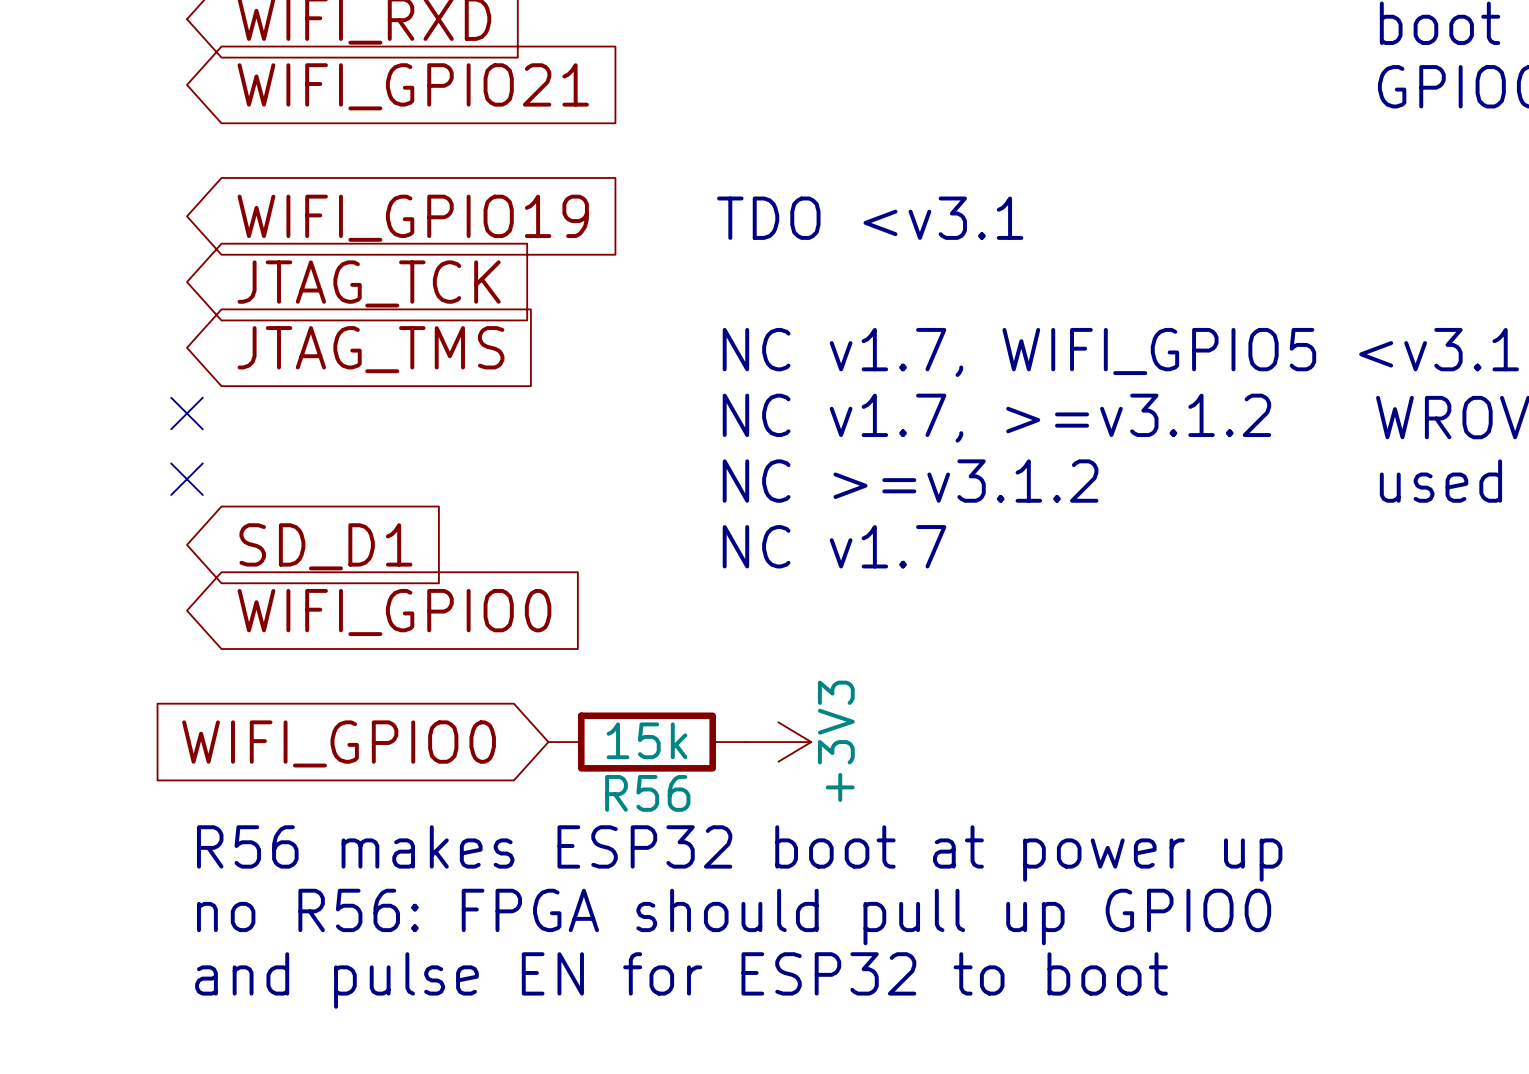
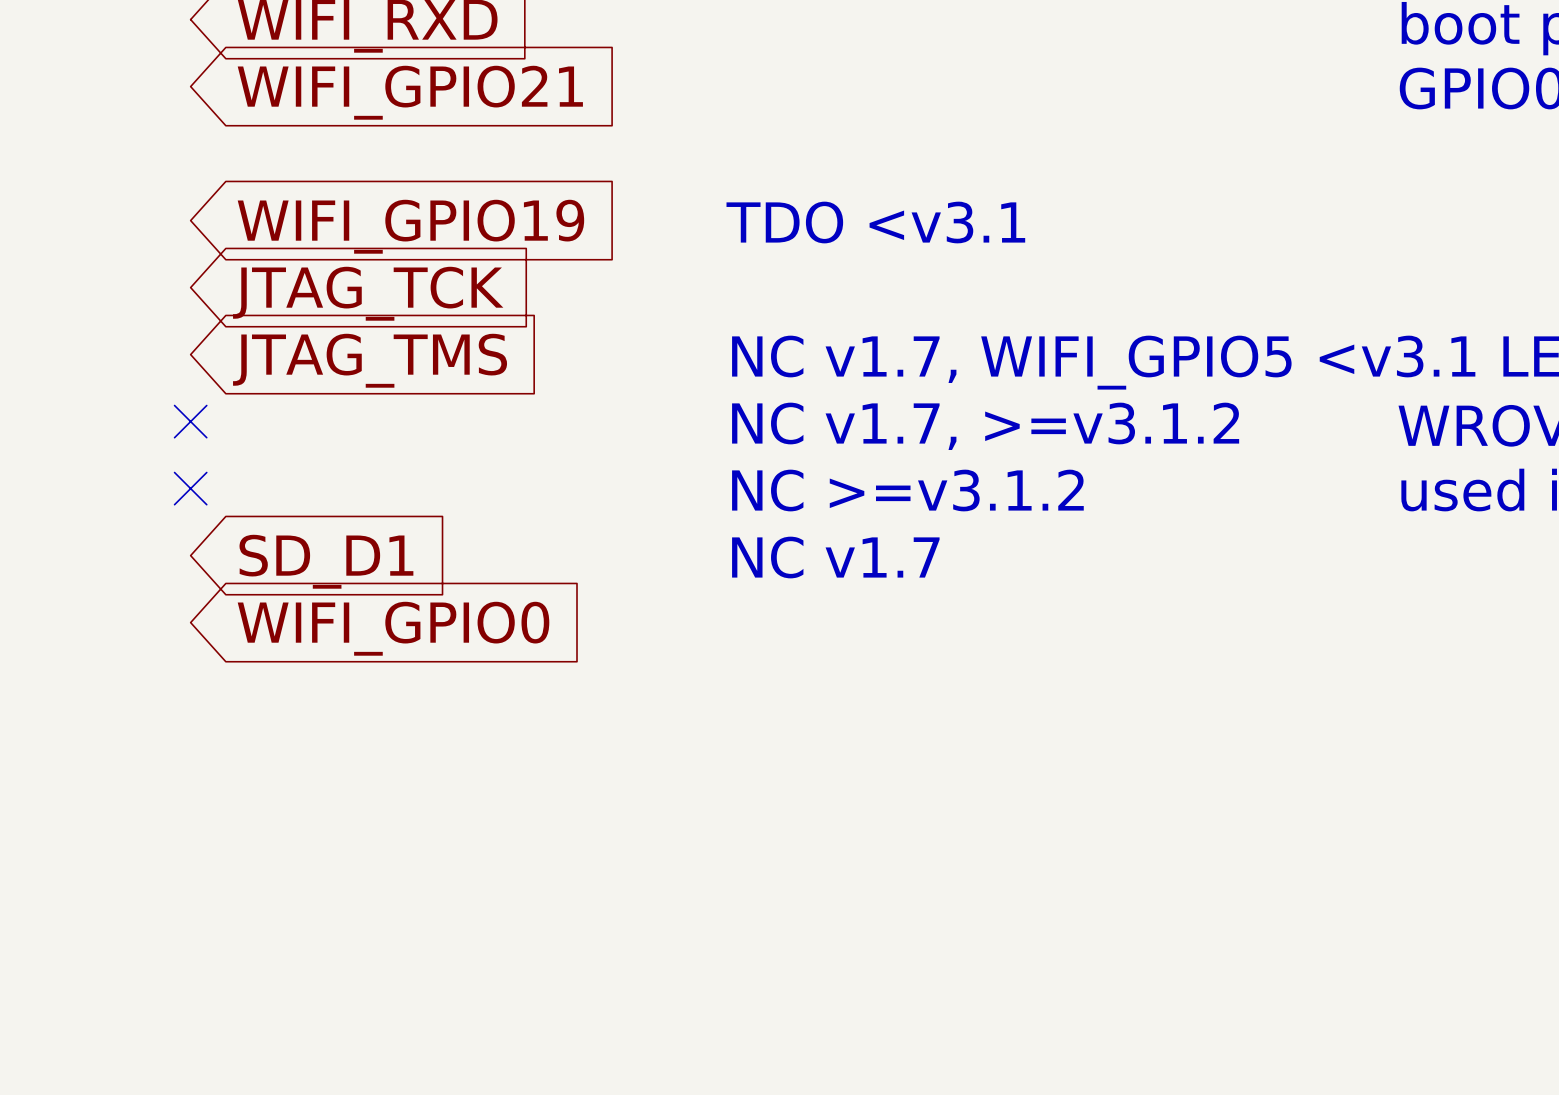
R56: 15k (646, 742) -> none
power symbol: +3V3 (778, 742) -> none
global label: WIFI_GPIO0 (339, 743) -> none
text: R56 makes ESP32 boot at power up (739, 853) -> none
text: no R56: FPGA should pull up GPIO0 (734, 916) -> none
text: and pulse EN for ESP32 to boot (681, 980) -> none

